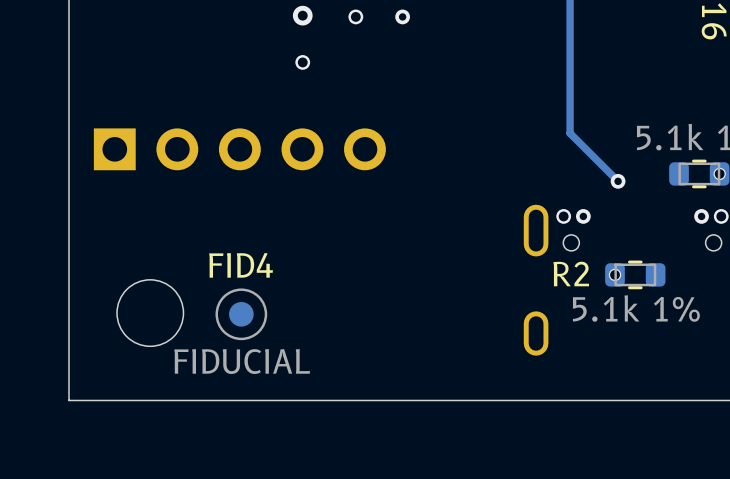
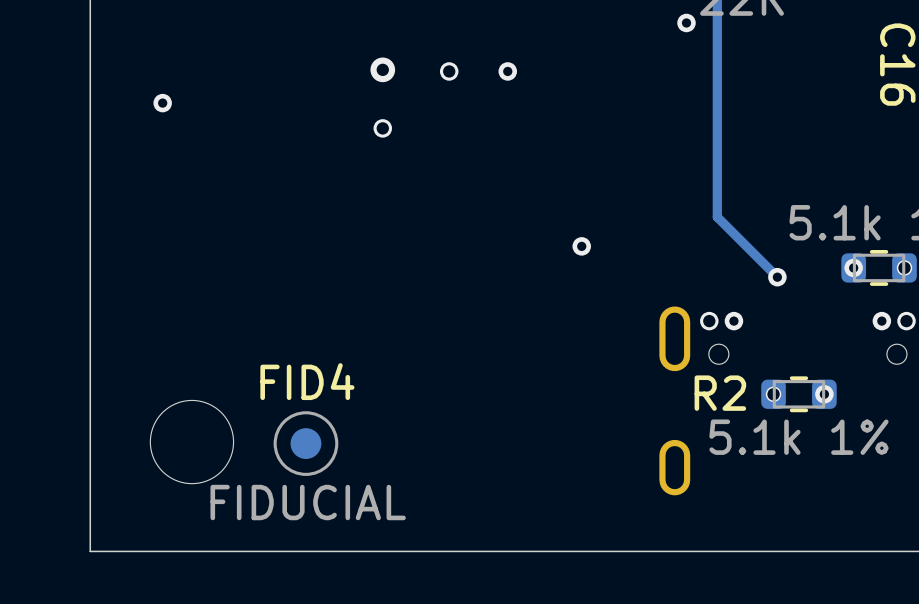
via: none -> (162, 103)
part: (239, 149) -> none
via: none -> (581, 246)
via: none -> (853, 267)
via: none -> (824, 394)

